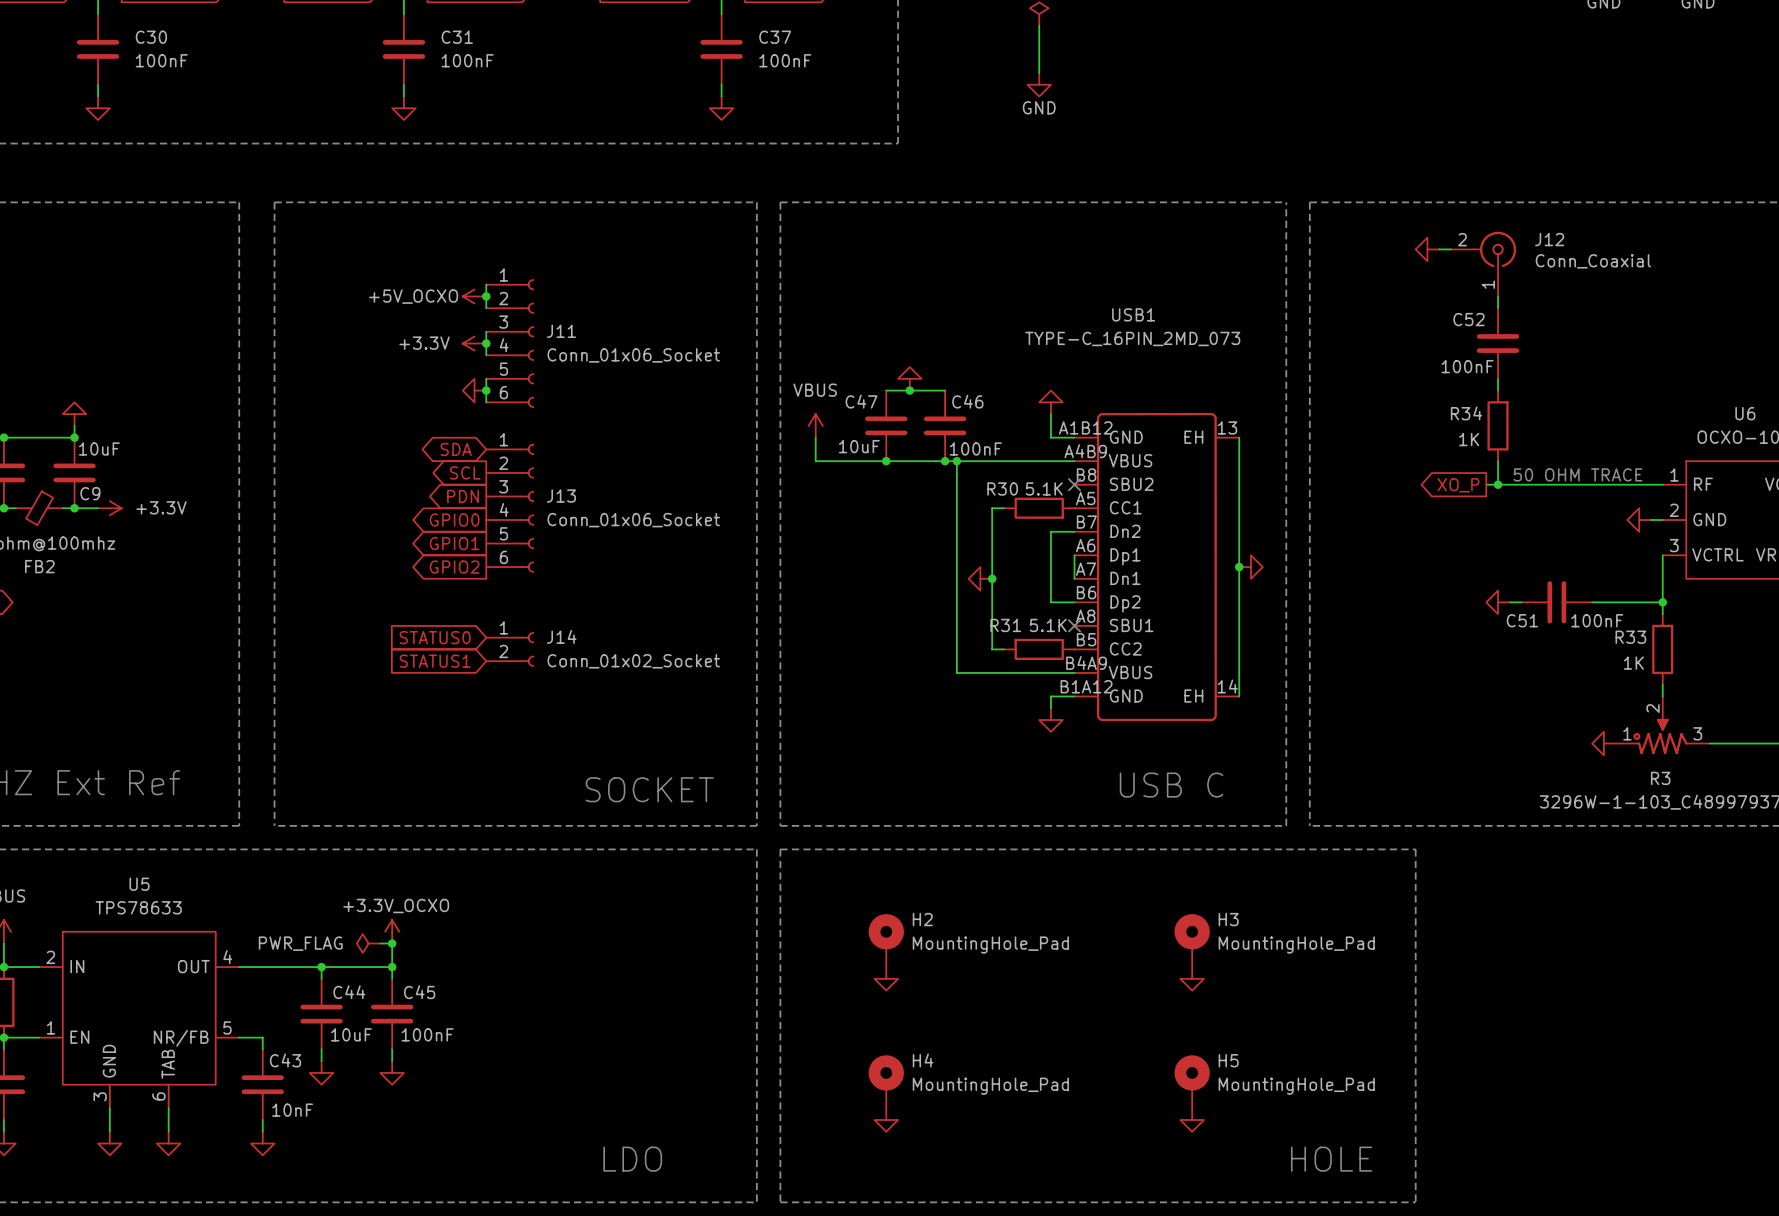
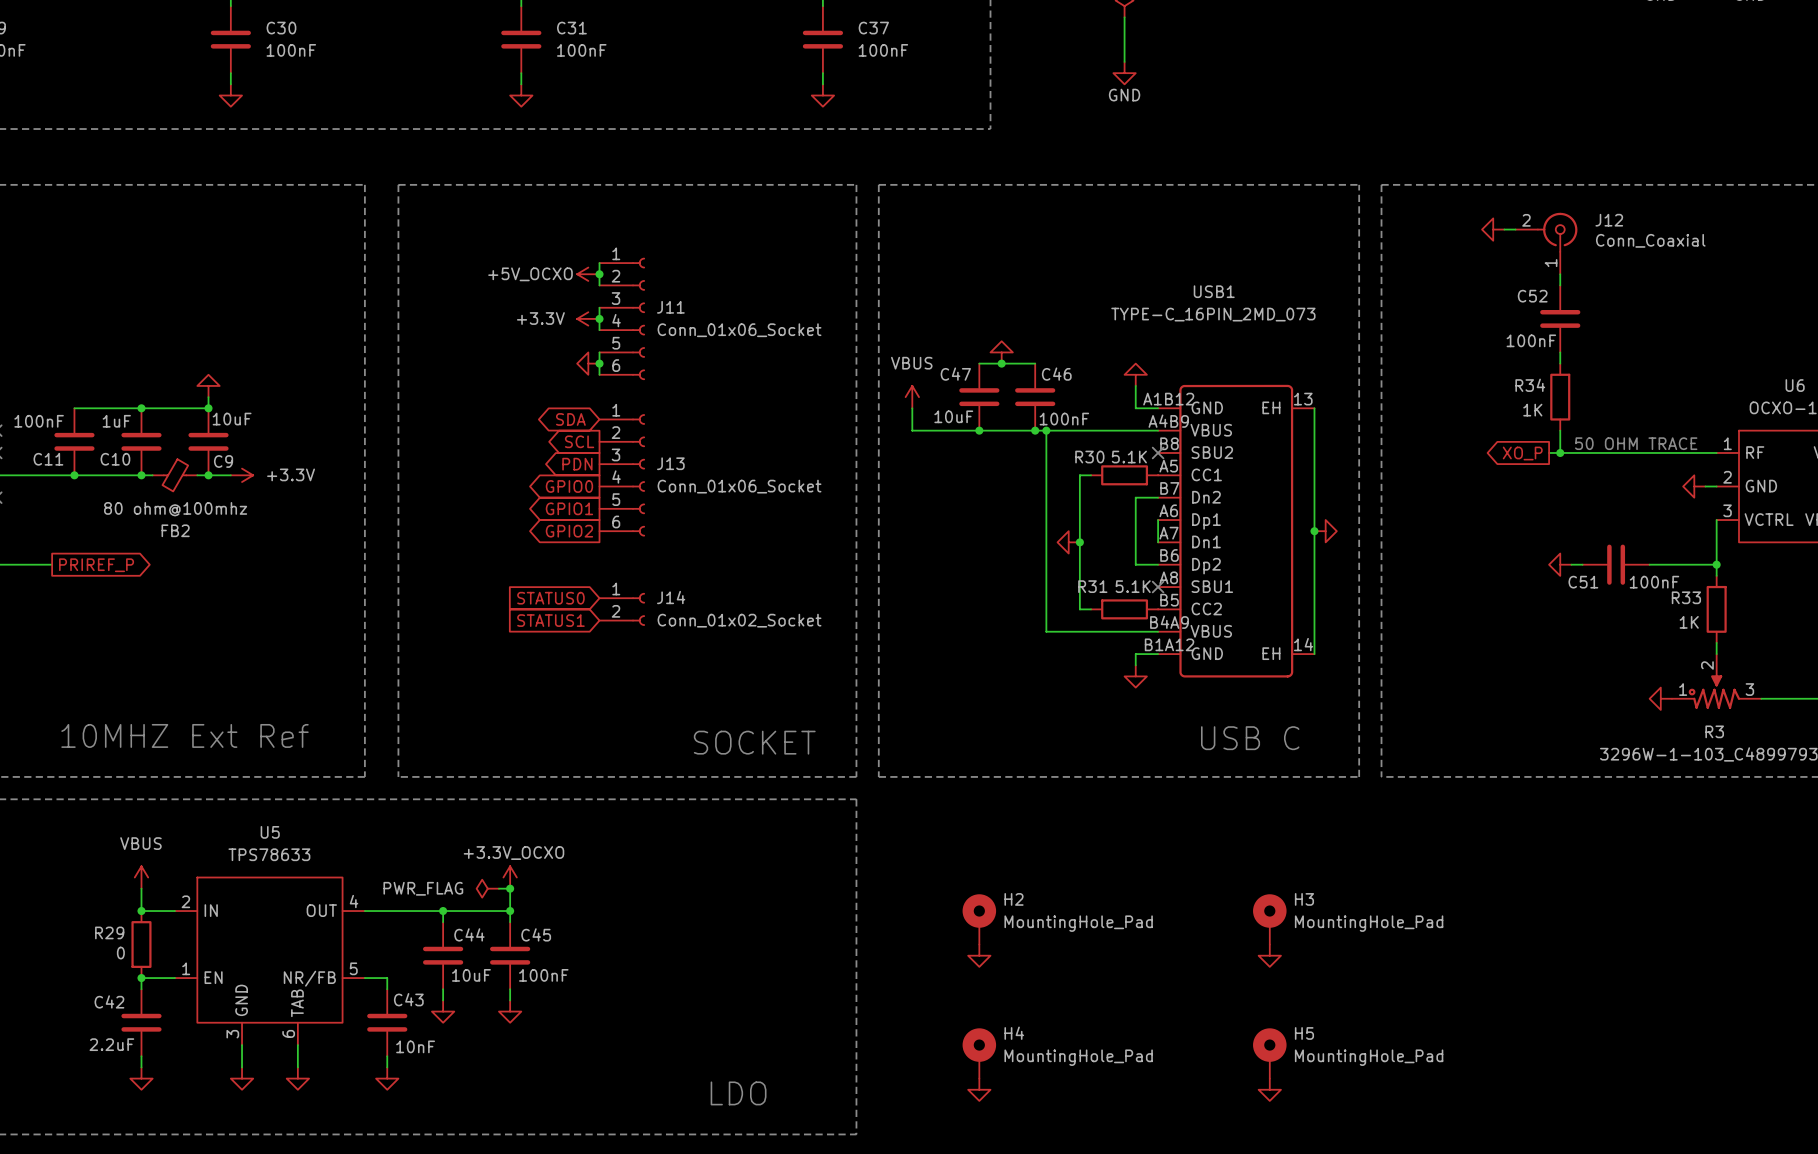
line: (780, 849) (780, 1202) (1415, 1202) (1415, 849) (780, 849) -> none
H2 position: (886, 940) -> (979, 919)
H3 position: (1192, 940) -> (1269, 919)
power symbol position: (886, 978) -> (979, 955)
power symbol position: (1192, 978) -> (1269, 955)
H4 position: (886, 1081) -> (979, 1053)
H5 position: (1192, 1081) -> (1269, 1053)
power symbol position: (886, 1119) -> (979, 1089)
power symbol position: (1192, 1119) -> (1269, 1089)
text: HOLE (1331, 1159) -> none

